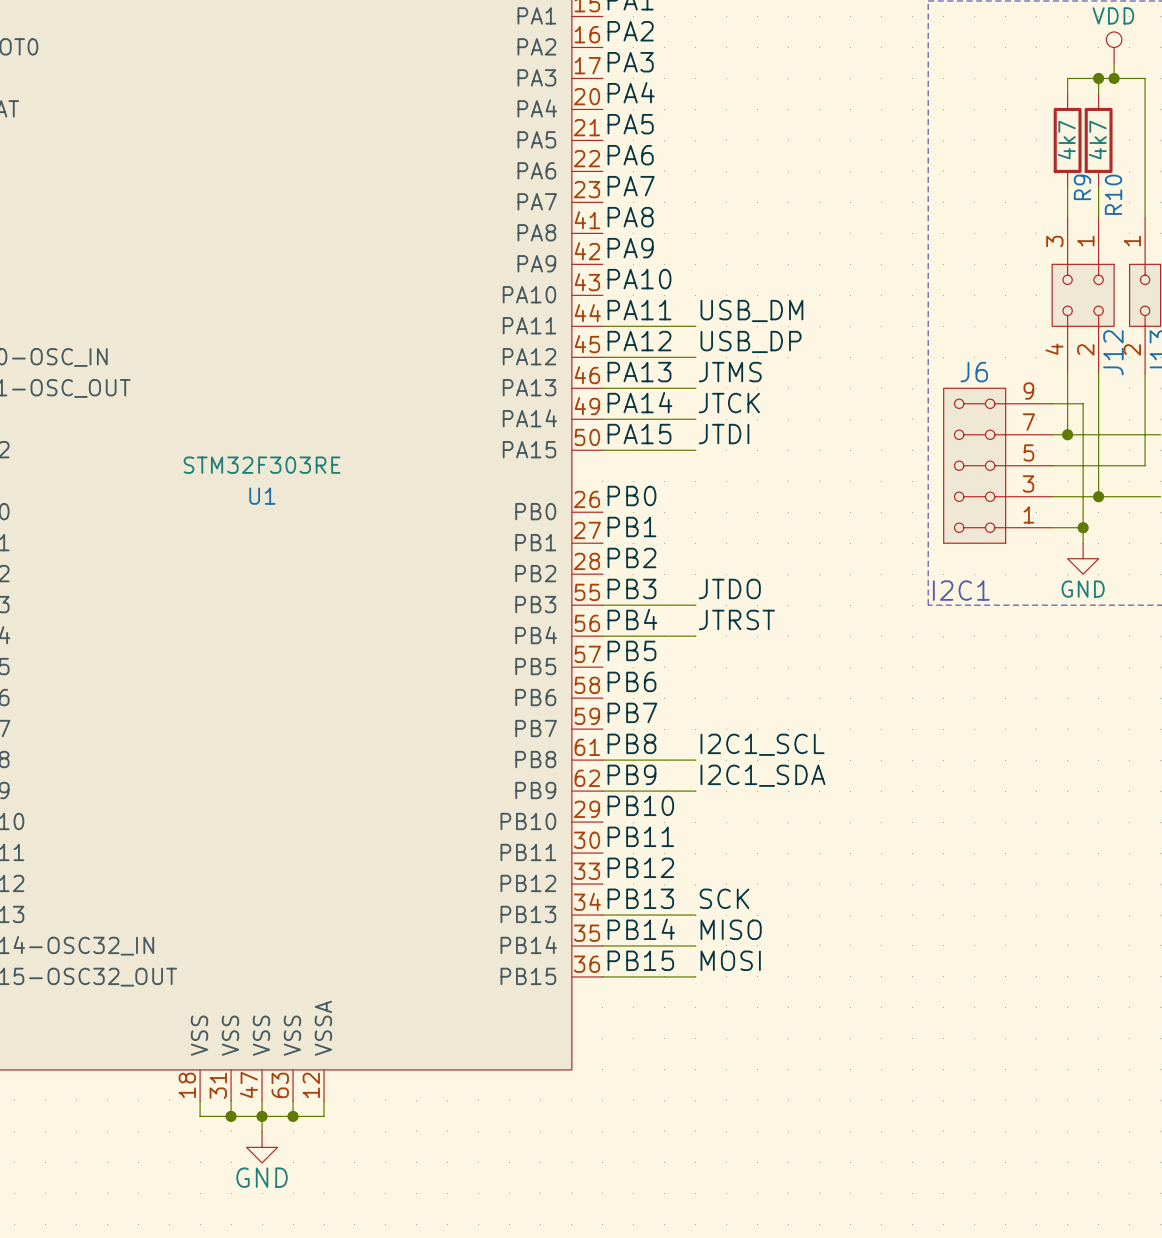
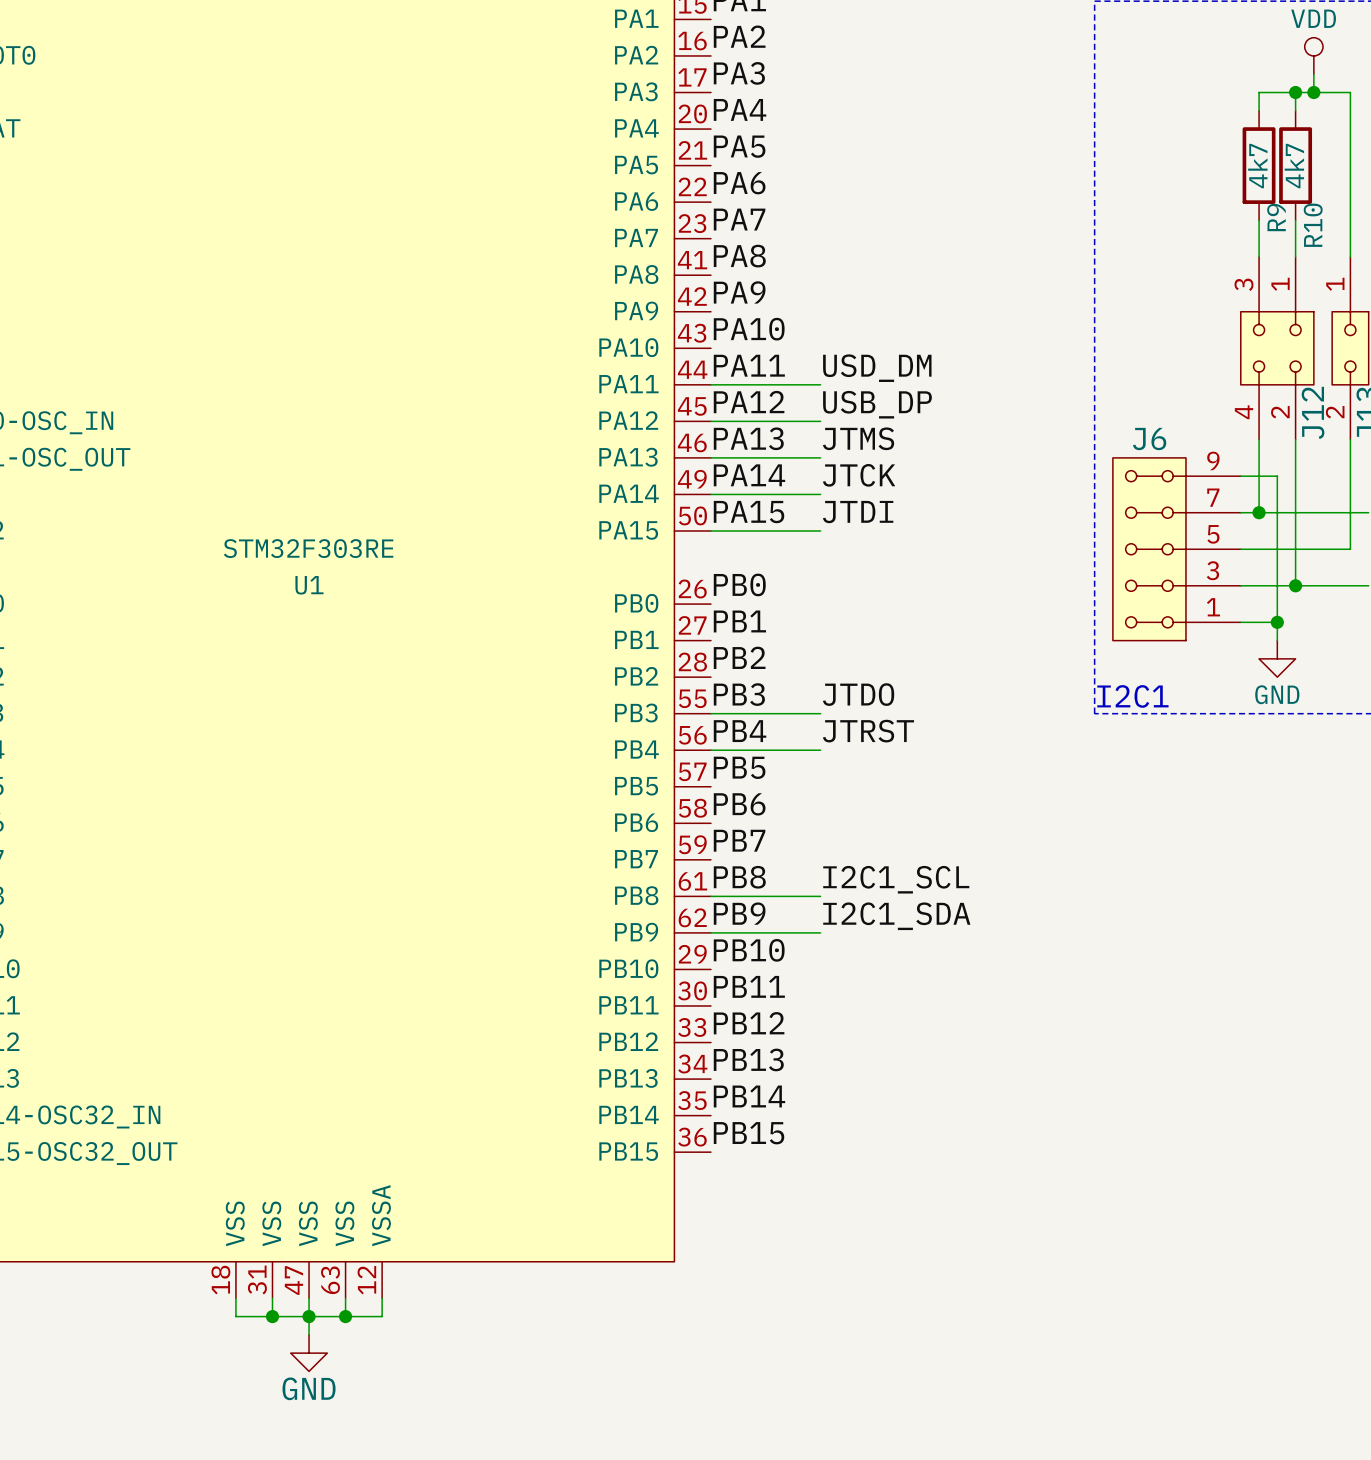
label: USB_DM (751, 310) -> USD_DM (877, 368)
label: SCK (724, 898) -> none
wire: (602, 915) (695, 915) -> none
label: MISO (731, 929) -> none
wire: (602, 945) (695, 945) -> none
label: MOSI (730, 960) -> none
wire: (602, 976) (695, 976) -> none

